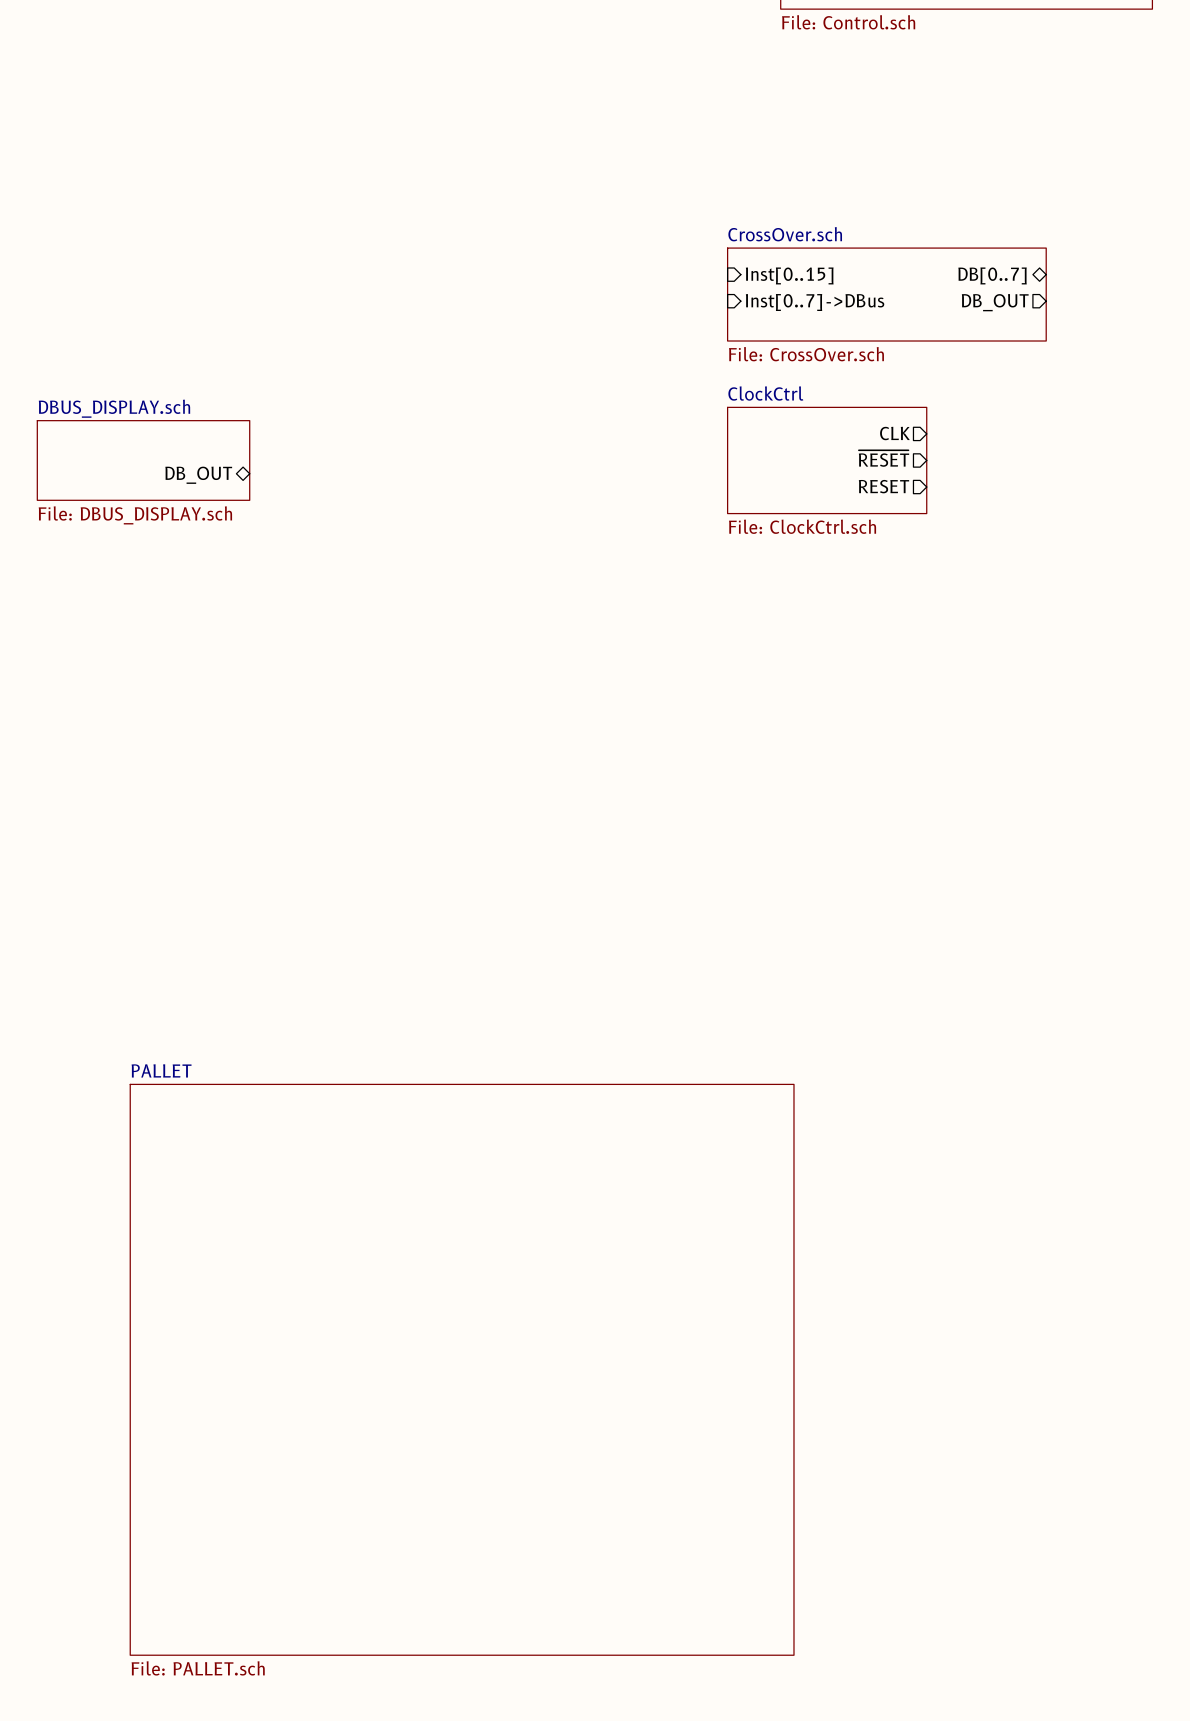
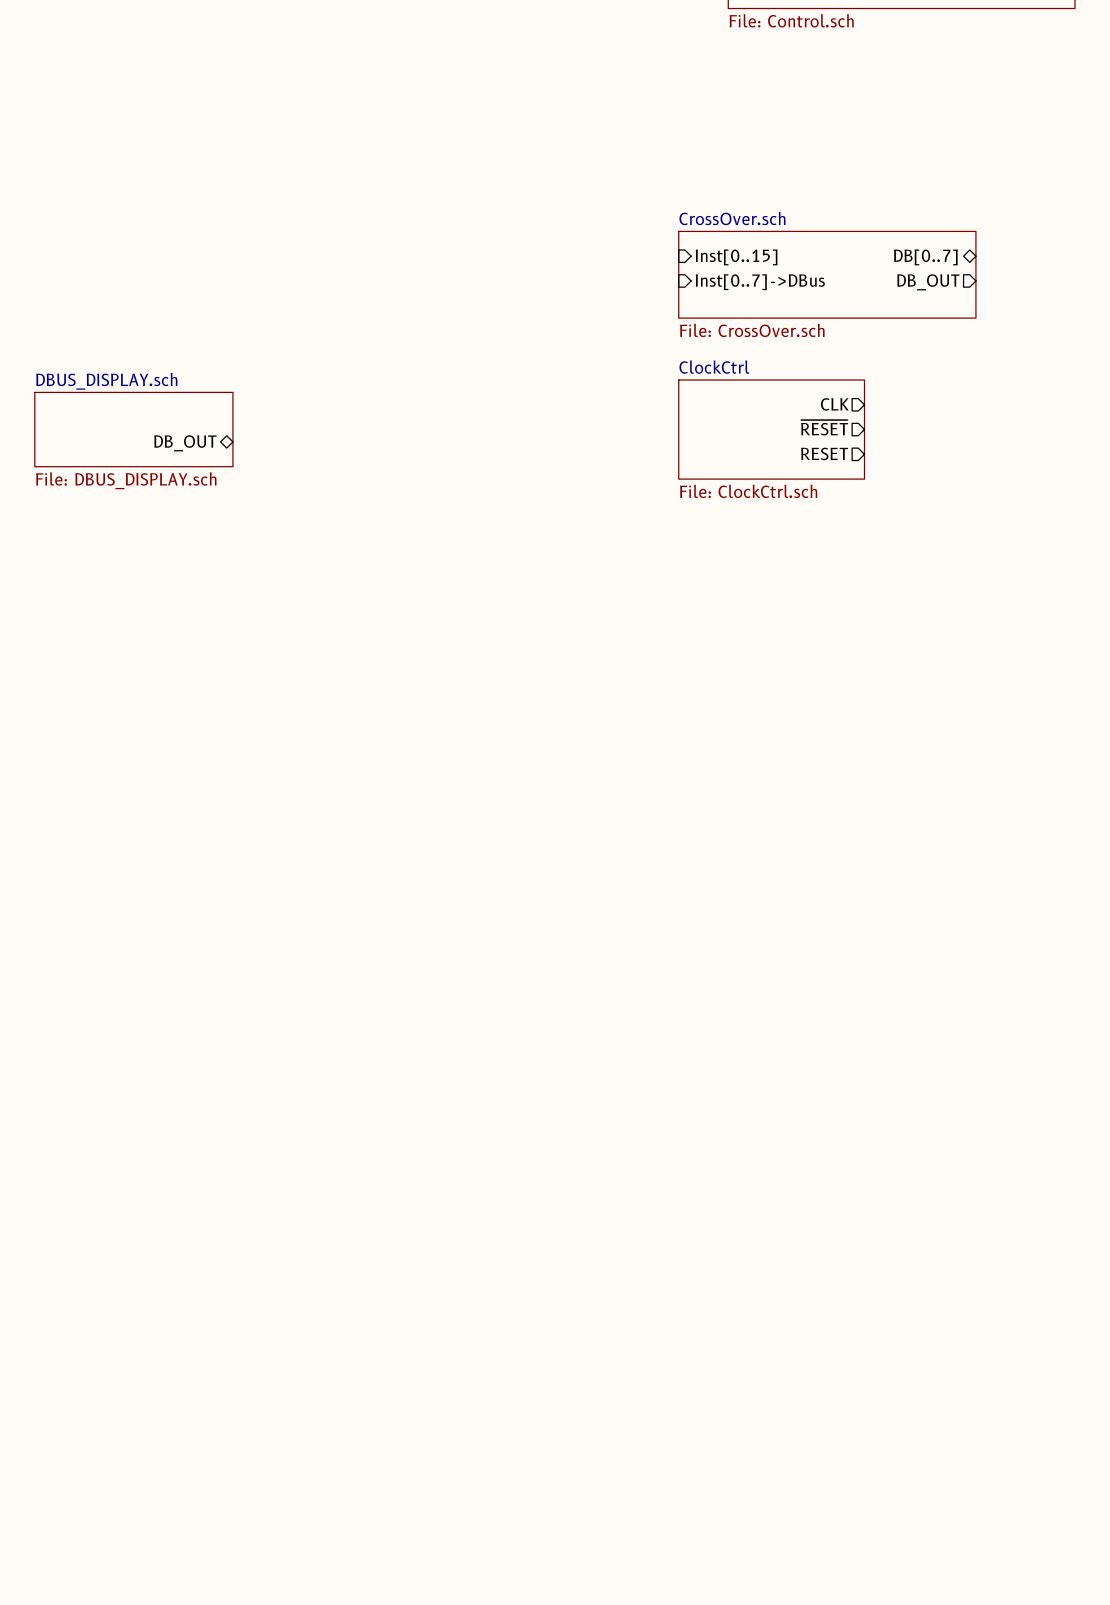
sheet PALLET: File: PALLET.sch (462, 1369) -> none

